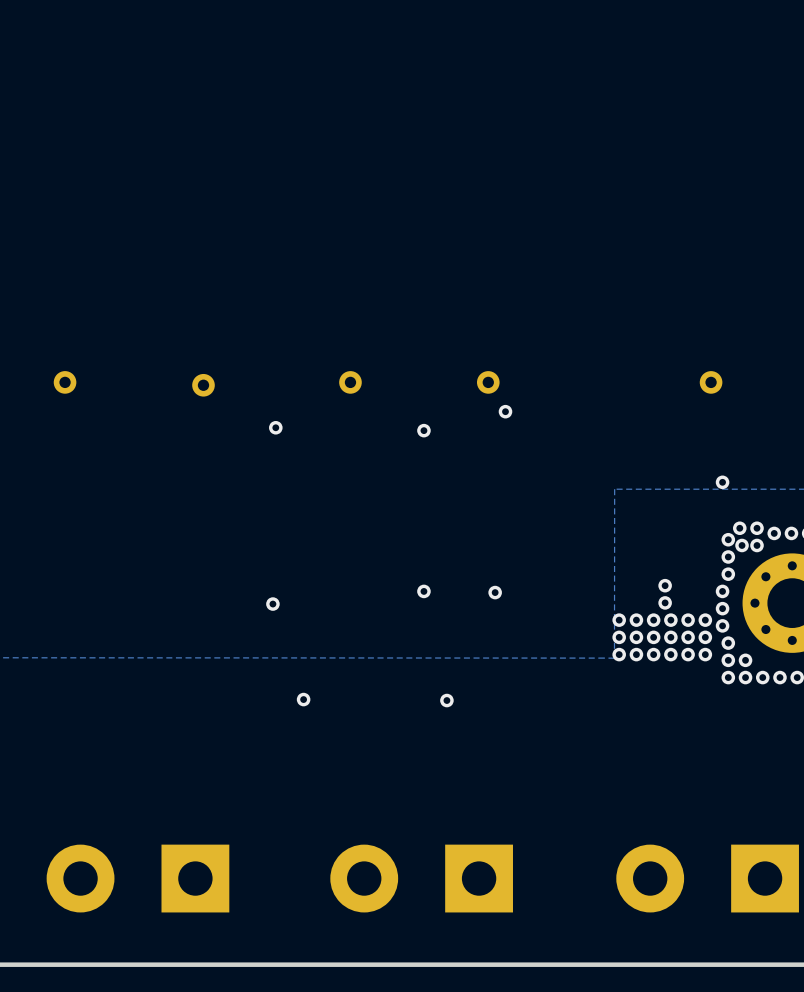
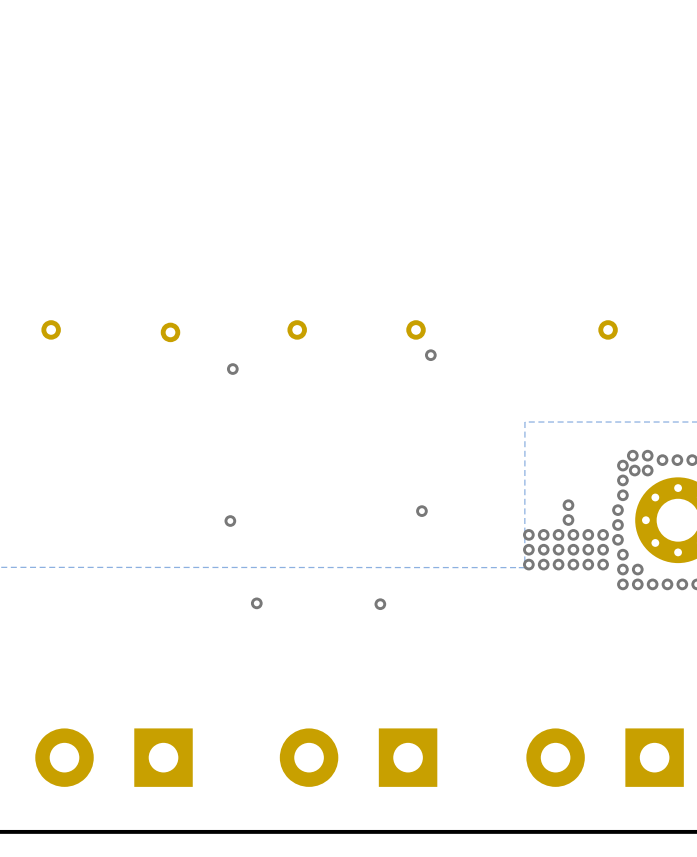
via: (423, 430) -> none
via: (722, 482) -> none
via: (423, 591) -> none

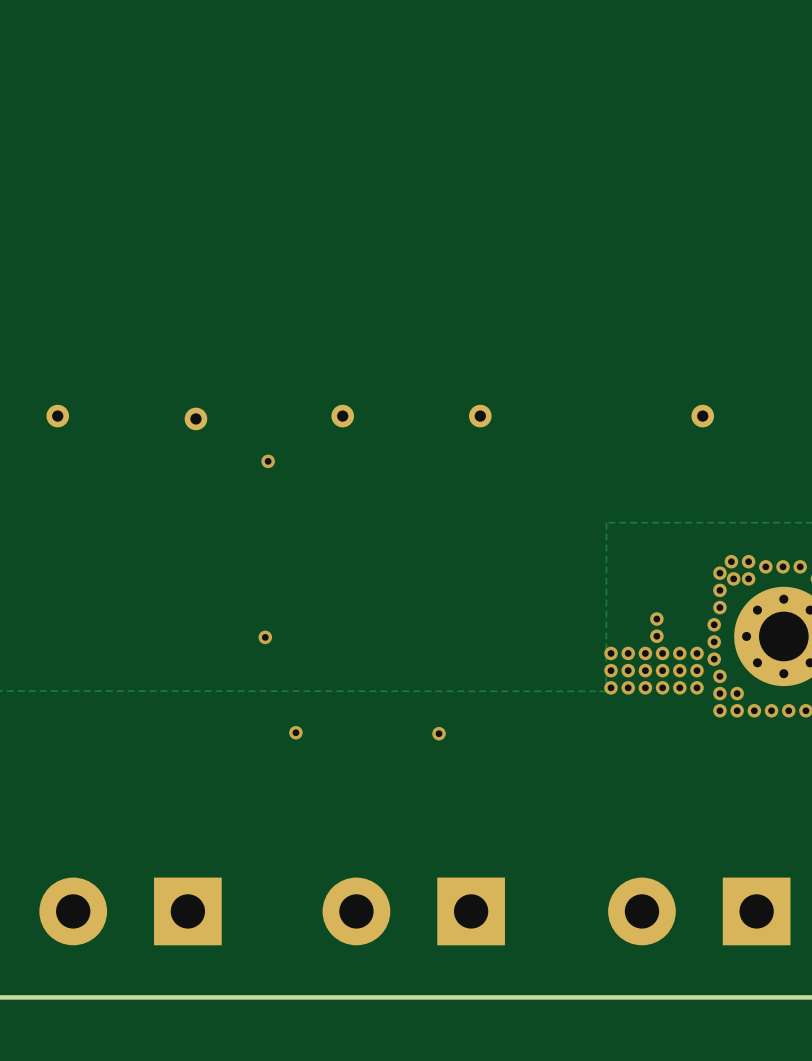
via: (430, 355) -> none
via: (421, 511) -> none

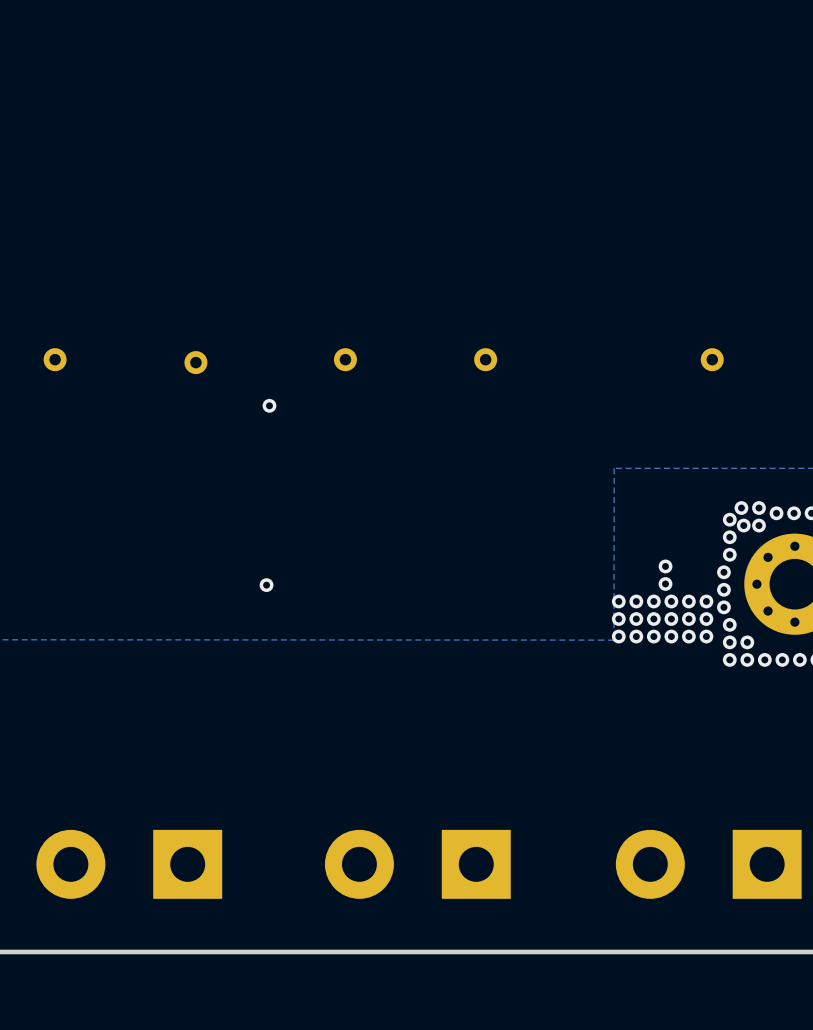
via: (295, 732) -> none
via: (439, 733) -> none

